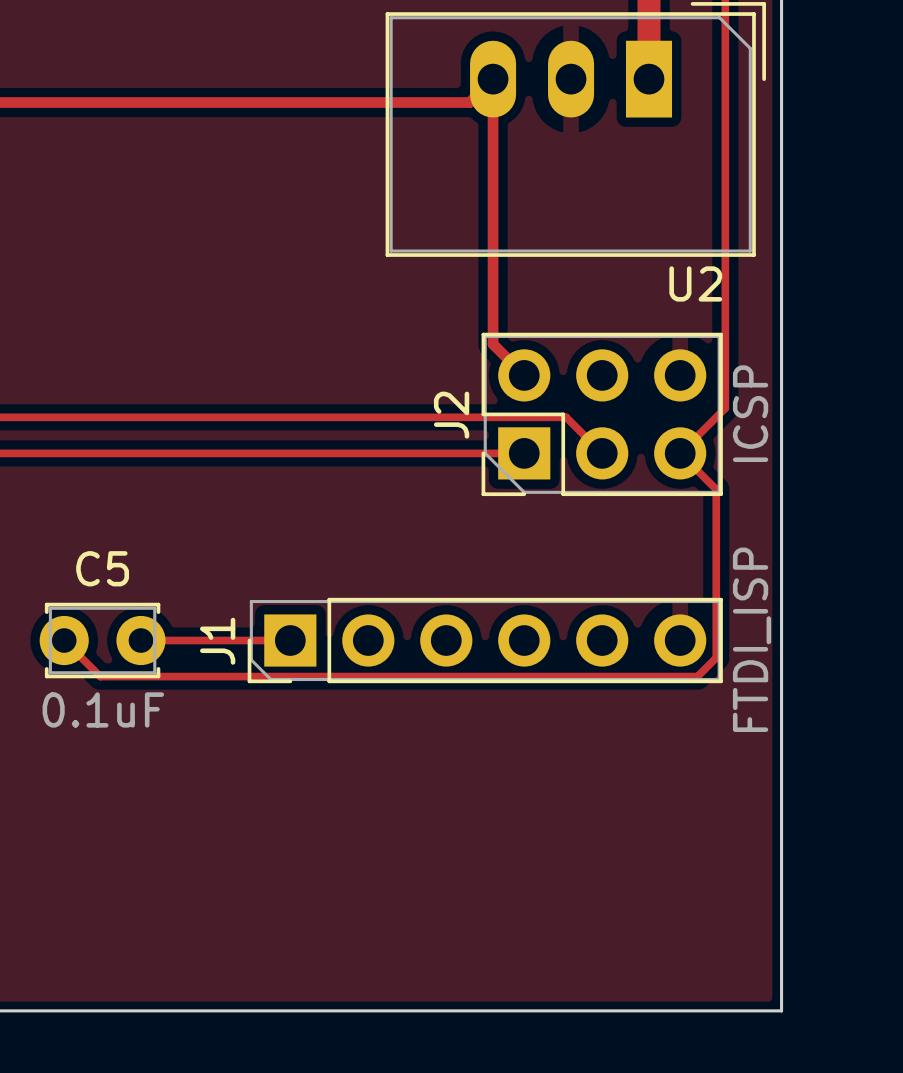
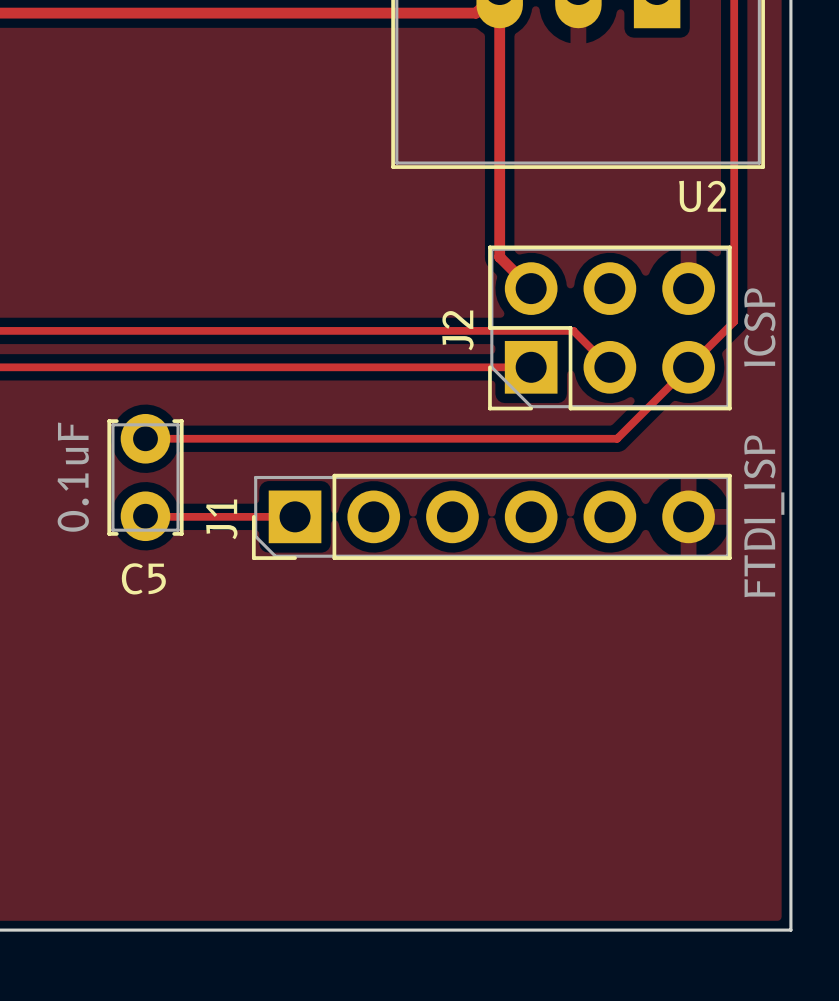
track: (680, 453) (716, 489) (716, 657) (697, 676) (100, 676) (64, 640) -> (688, 367) (617, 438) (145, 438)
C5 name position: C5 (102, 568) -> C5 (143, 578)
C5 rotation: 0° (102, 640) -> 90° clockwise (145, 477)
C5 position: (102, 640) -> (145, 477)
track: (140, 640) (290, 640) -> (144, 516) (295, 516)
J1 position: (485, 640) -> (491, 516)

